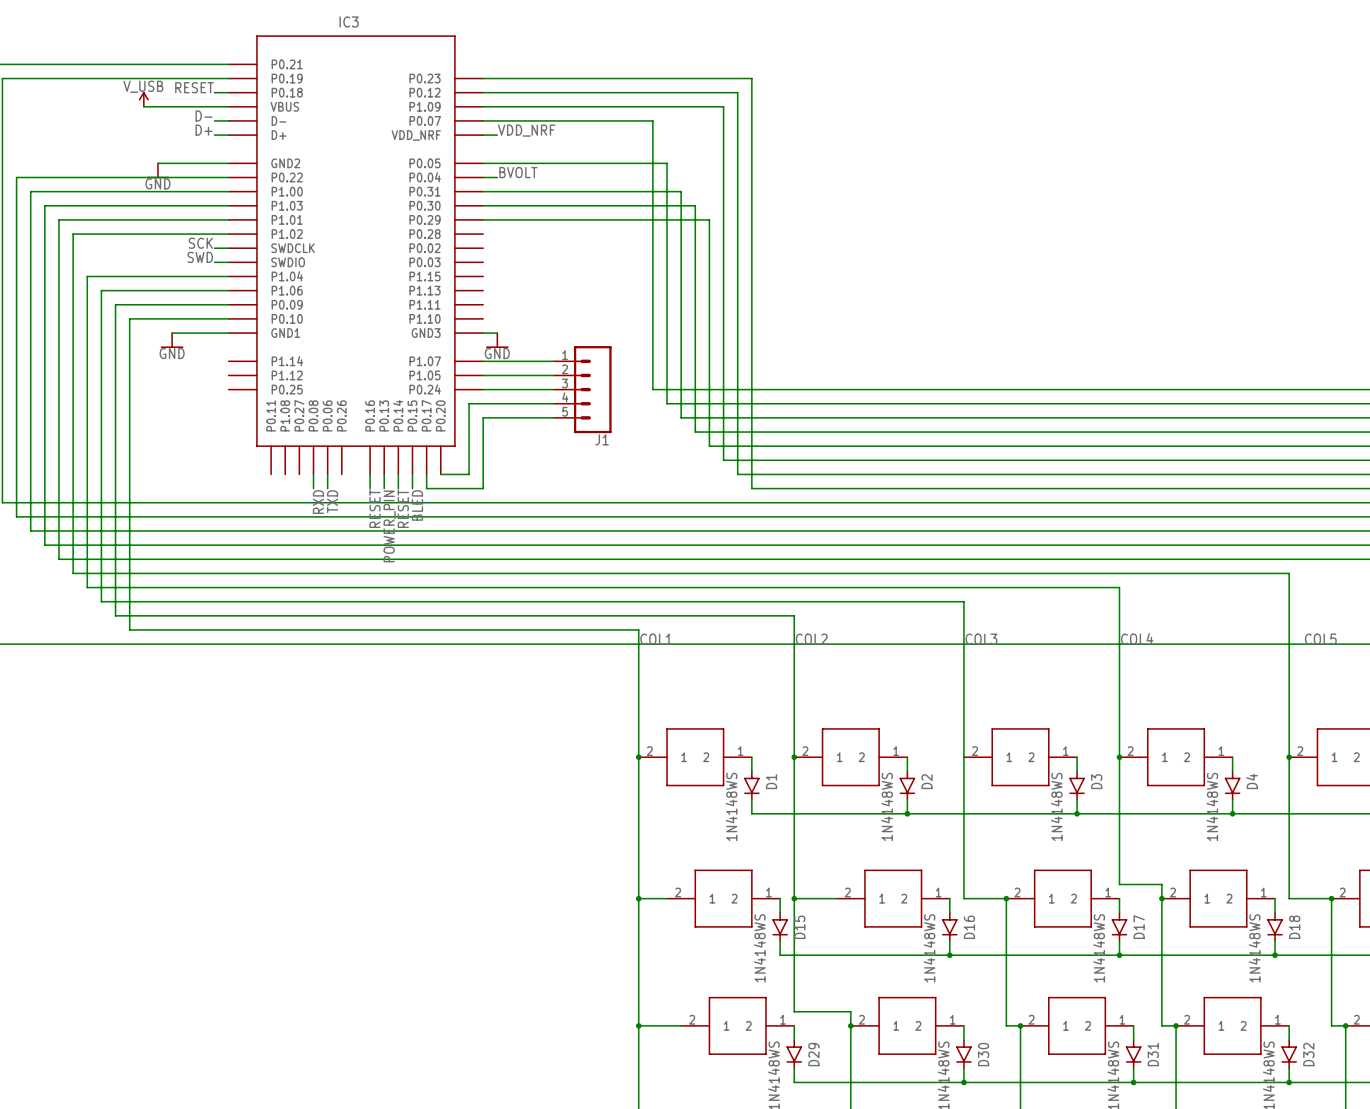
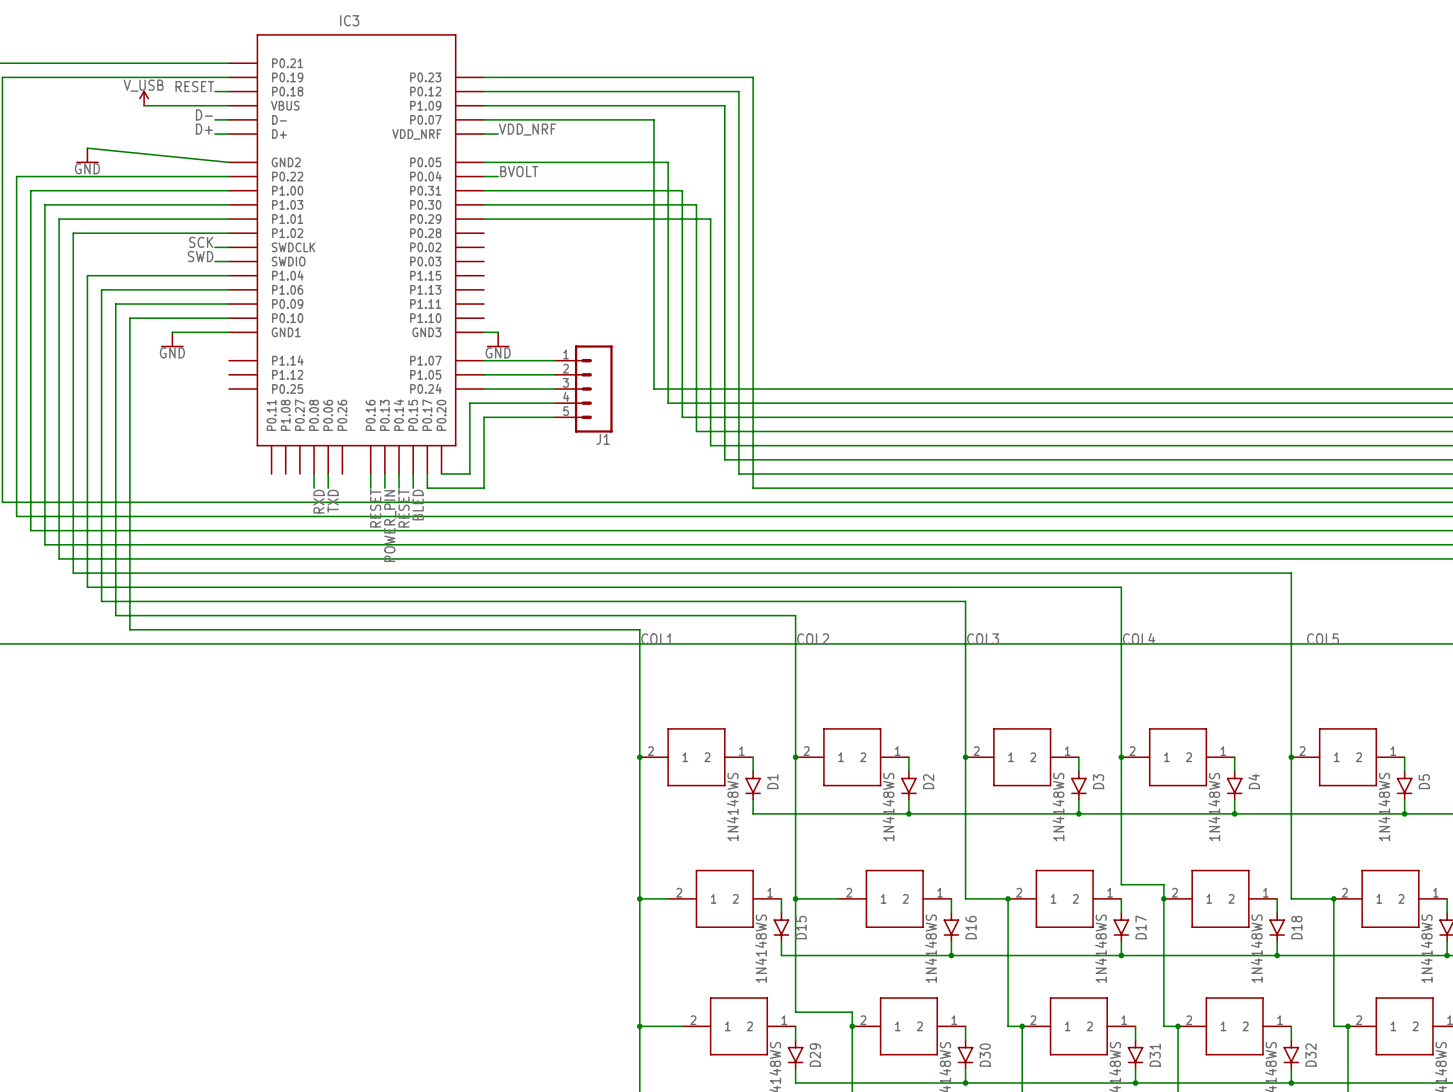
wire: (157, 163) (228, 163) -> (87, 148) (229, 162)
power symbol position: GND (157, 170) -> GND (87, 155)
junction: none -> (965, 757)

